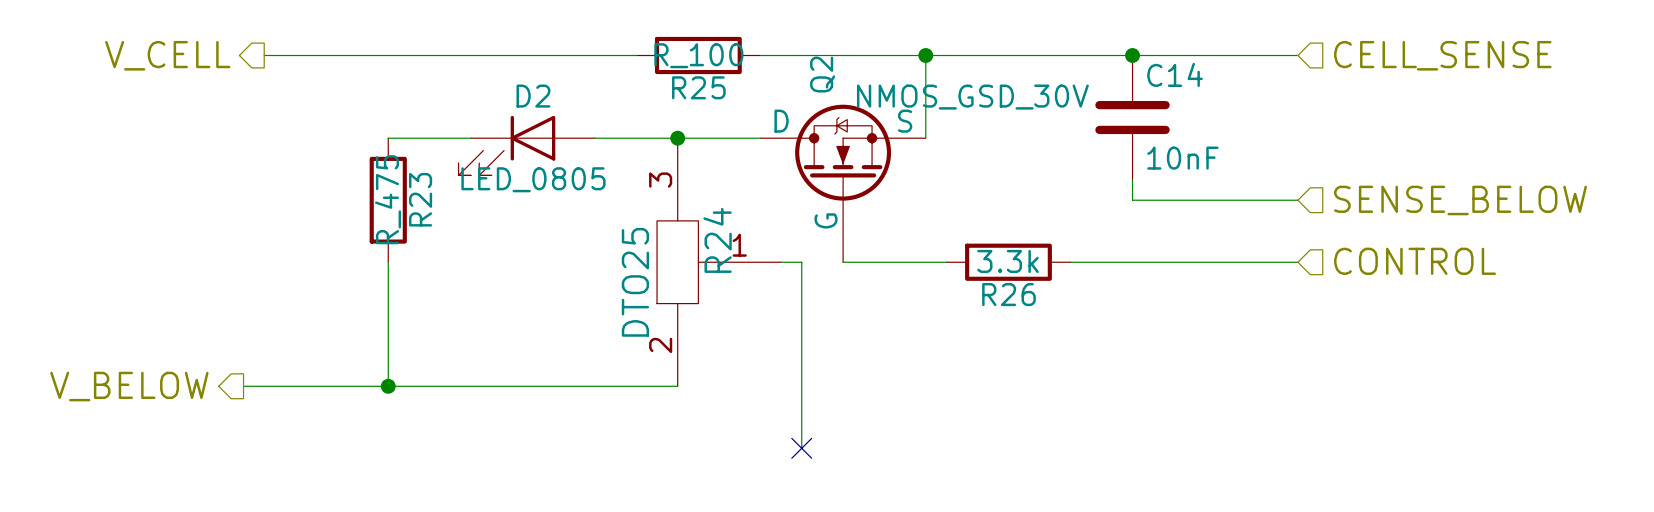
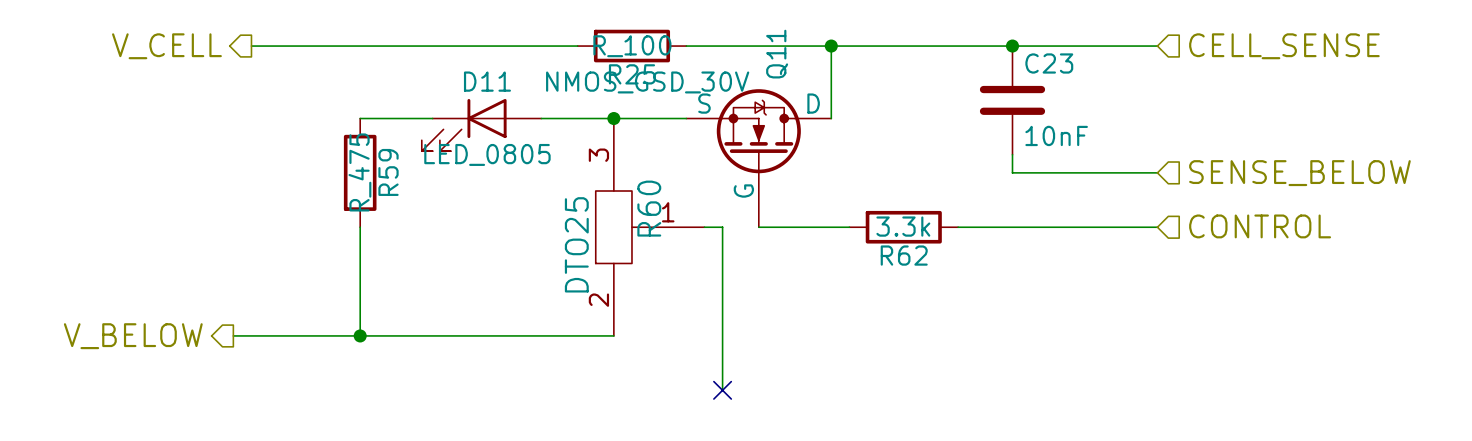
C14 name: C14 (1175, 74) -> C23 (1049, 63)
D2 name: D2 (533, 96) -> D11 (487, 81)
Q2: NMOS_GSD_30V (843, 183) -> none
Q11: none -> NMOS_GSD_30V (758, 158)
R23 name: R23 (420, 199) -> R59 (388, 172)
R24 name: R24 (717, 240) -> R60 (649, 208)
R26 name: R26 (1008, 294) -> R62 (904, 255)

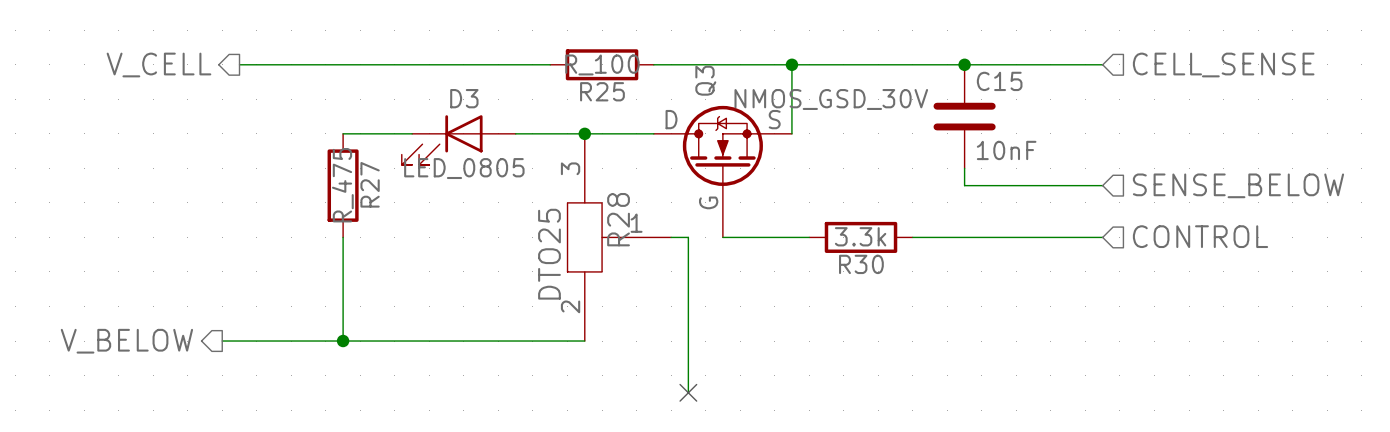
C23 name: C23 (1049, 63) -> C15 (999, 81)
D11 name: D11 (487, 81) -> D3 (464, 98)
Q11: NMOS_GSD_30V (758, 158) -> none
Q3: none -> NMOS_GSD_30V (722, 171)
R59 name: R59 (388, 172) -> R27 (370, 184)
R60 name: R60 (649, 208) -> R28 (618, 219)
R62 name: R62 (904, 255) -> R30 (861, 264)

